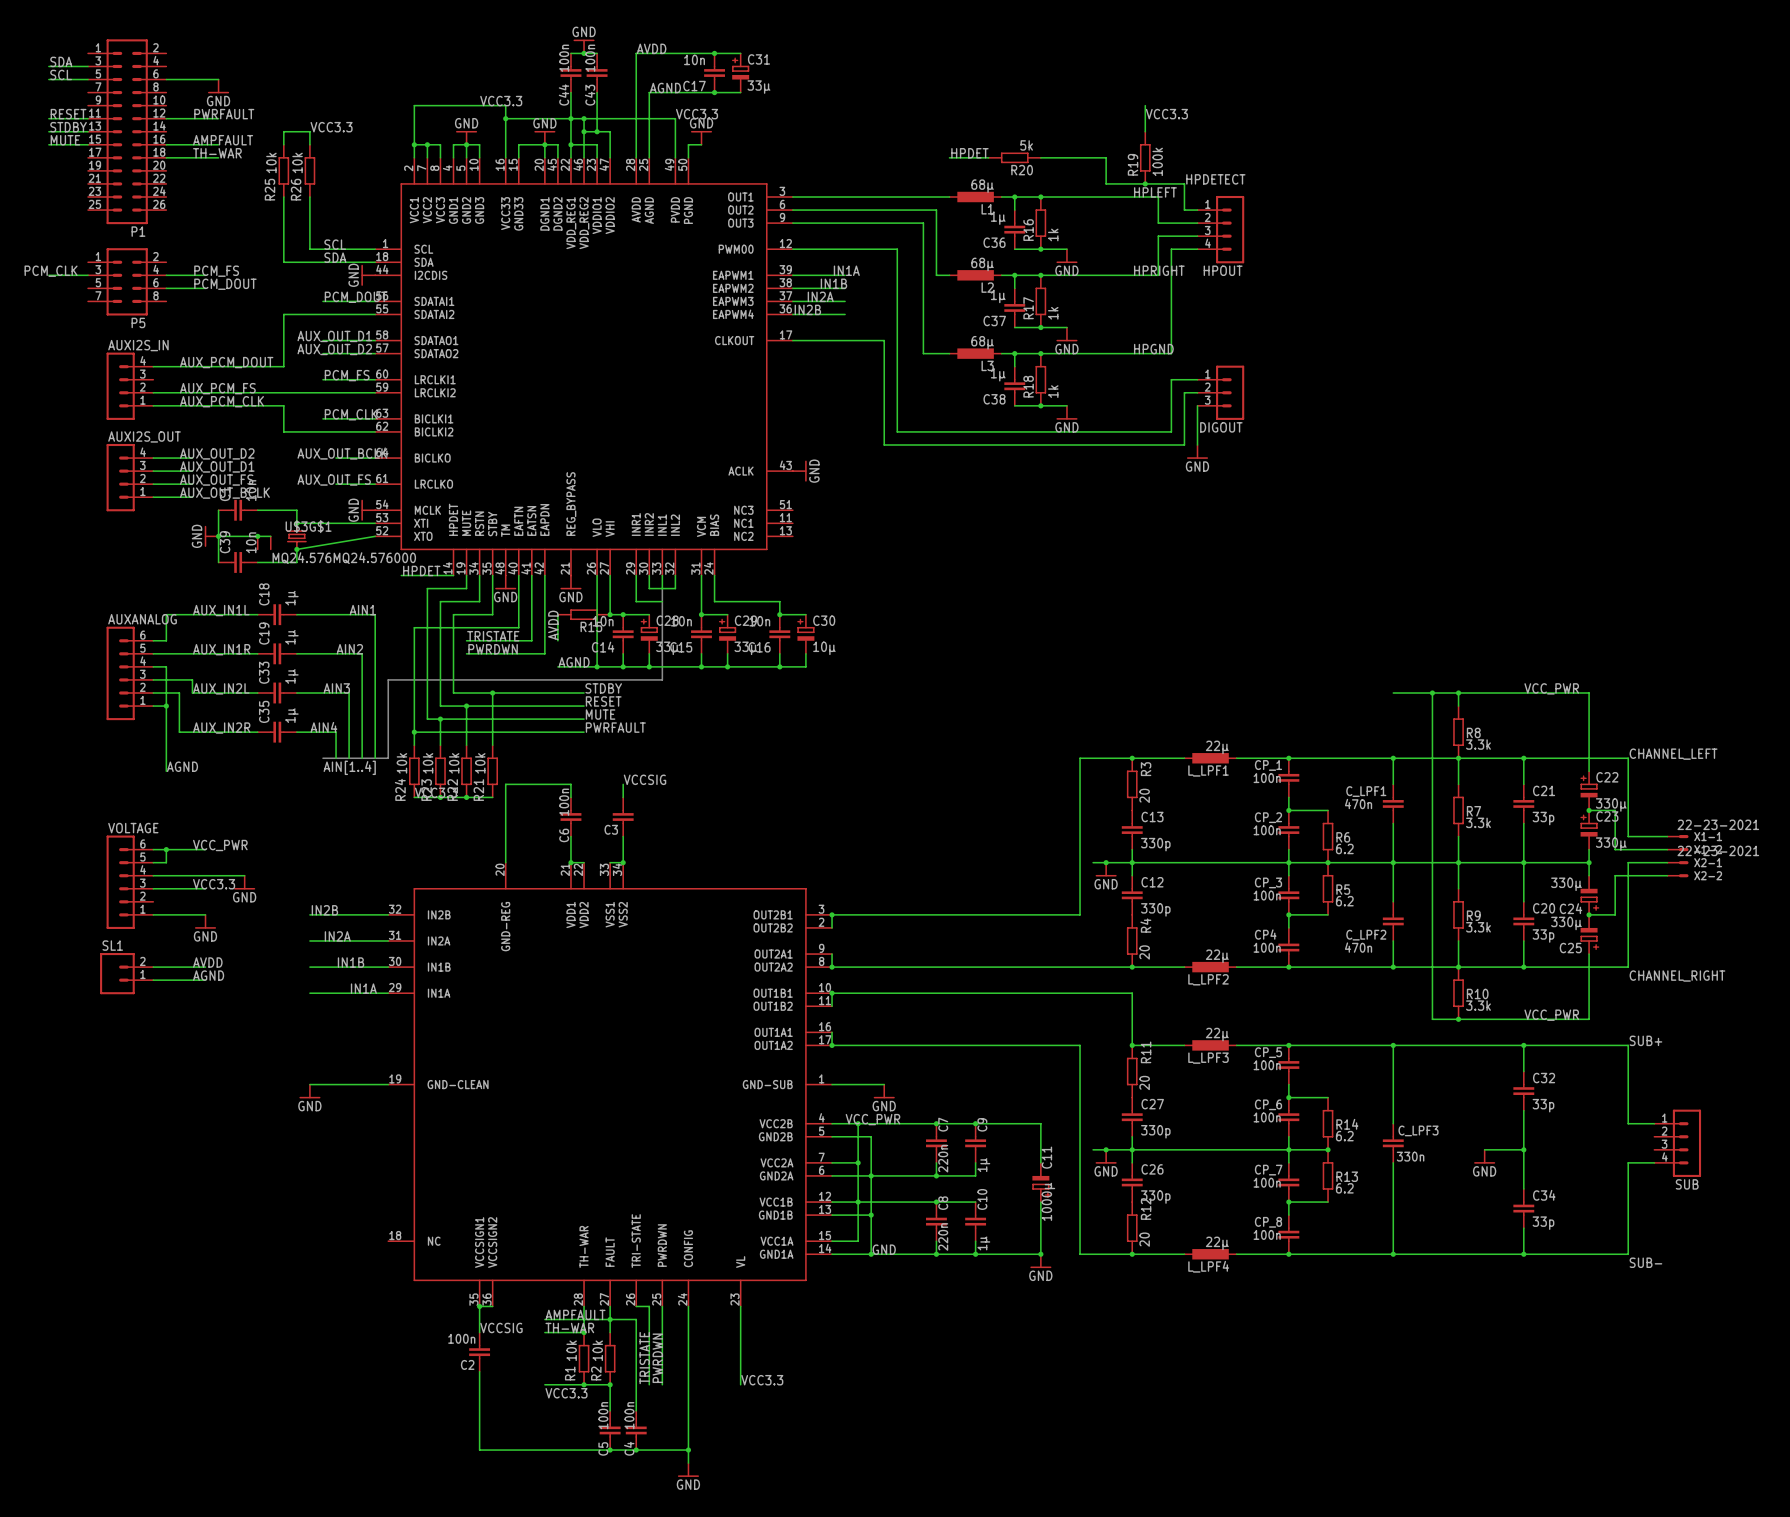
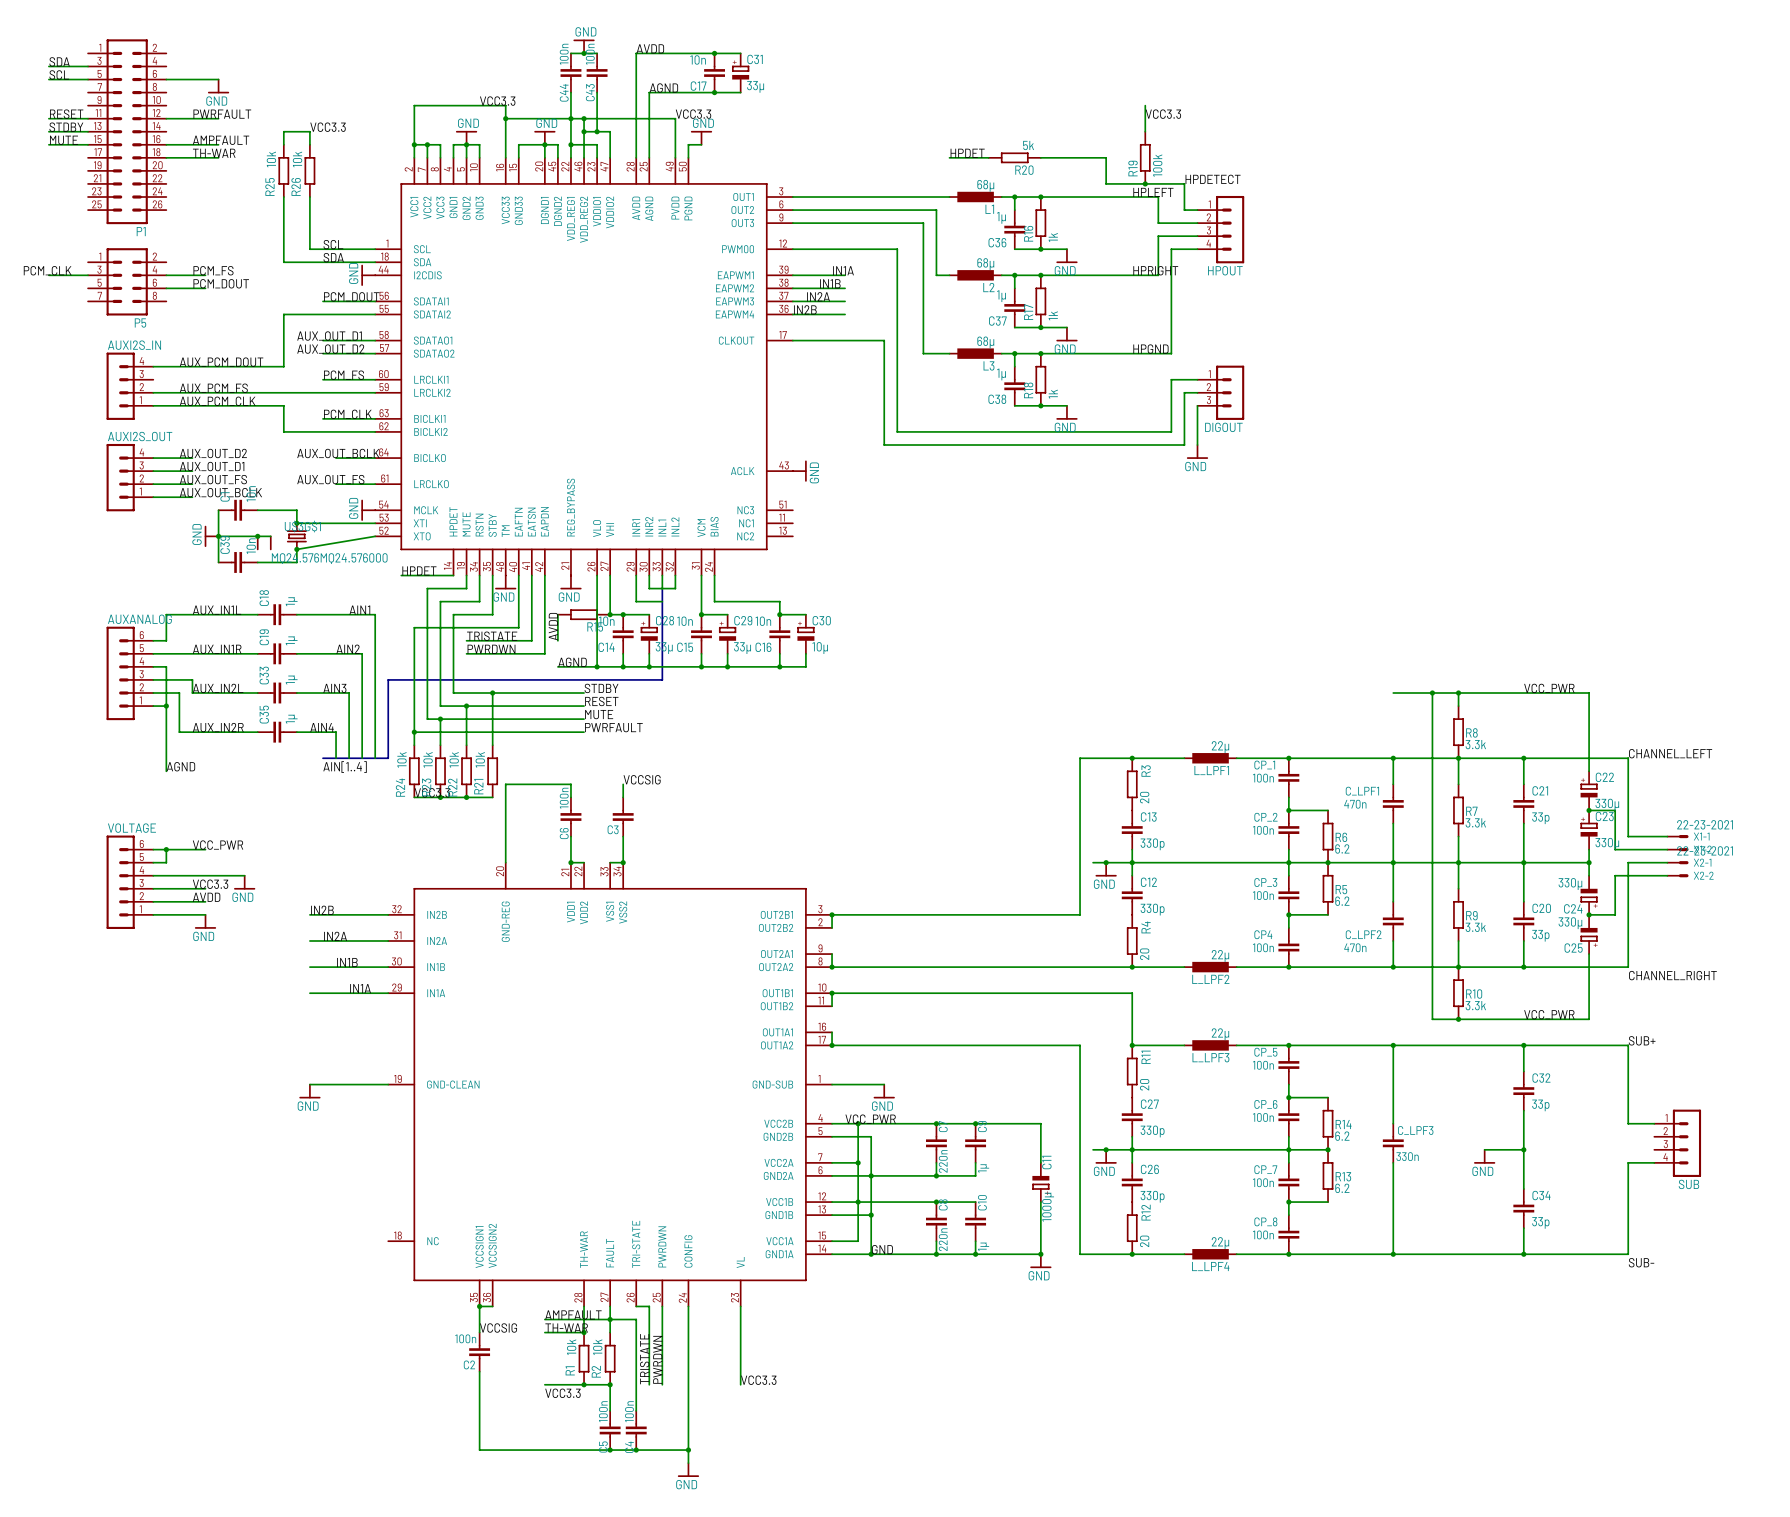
label position: AVDD (207, 962) -> AVDD (206, 897)
wire: (153, 967) (205, 967) -> (153, 901) (205, 901)
SL1: (126, 973) -> none
label: AGND (208, 975) -> none
wire: (153, 980) (205, 980) -> none

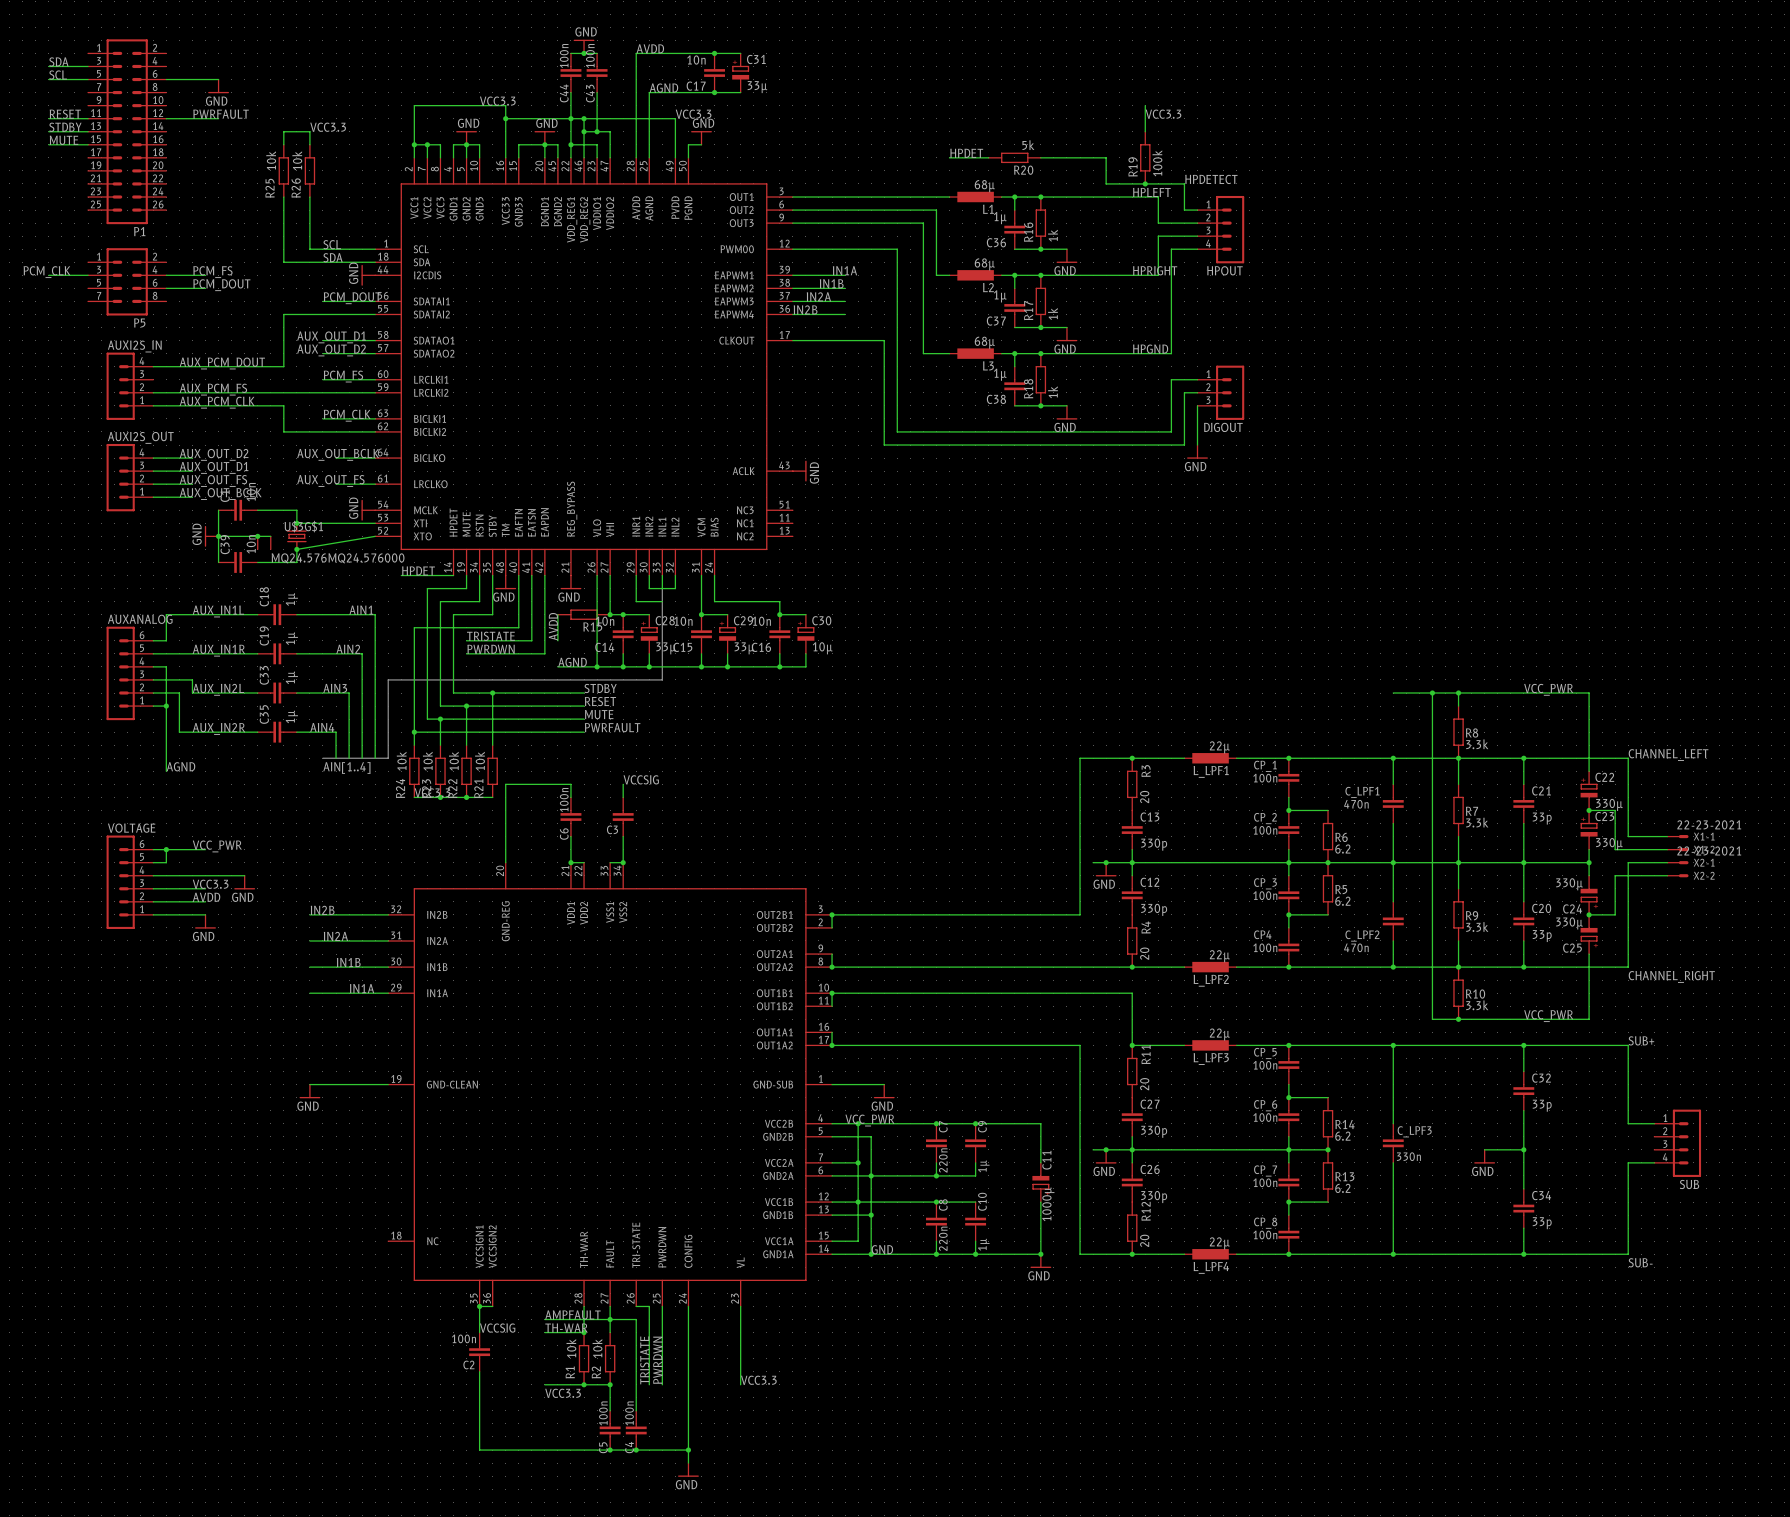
label: AMPFAULT (221, 140) -> none
wire: (166, 144) (218, 144) -> none
label: TH-WAR (214, 153) -> none
wire: (166, 157) (218, 157) -> none

